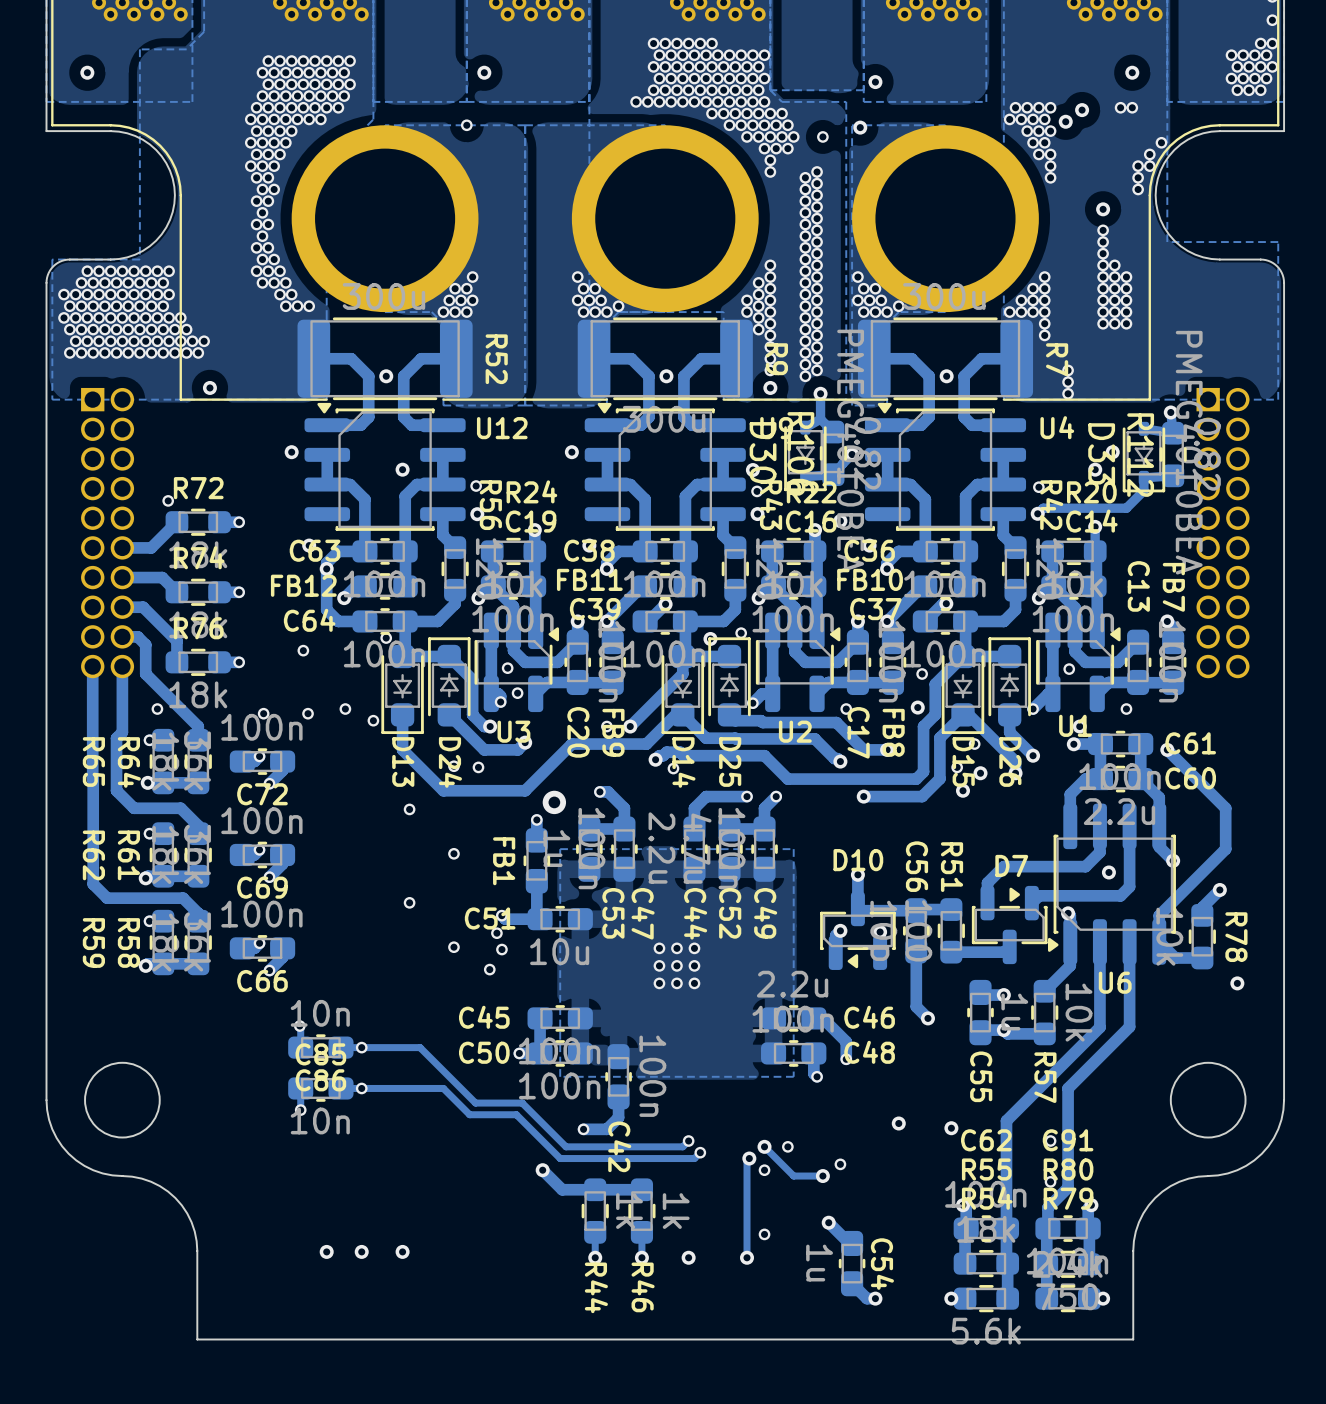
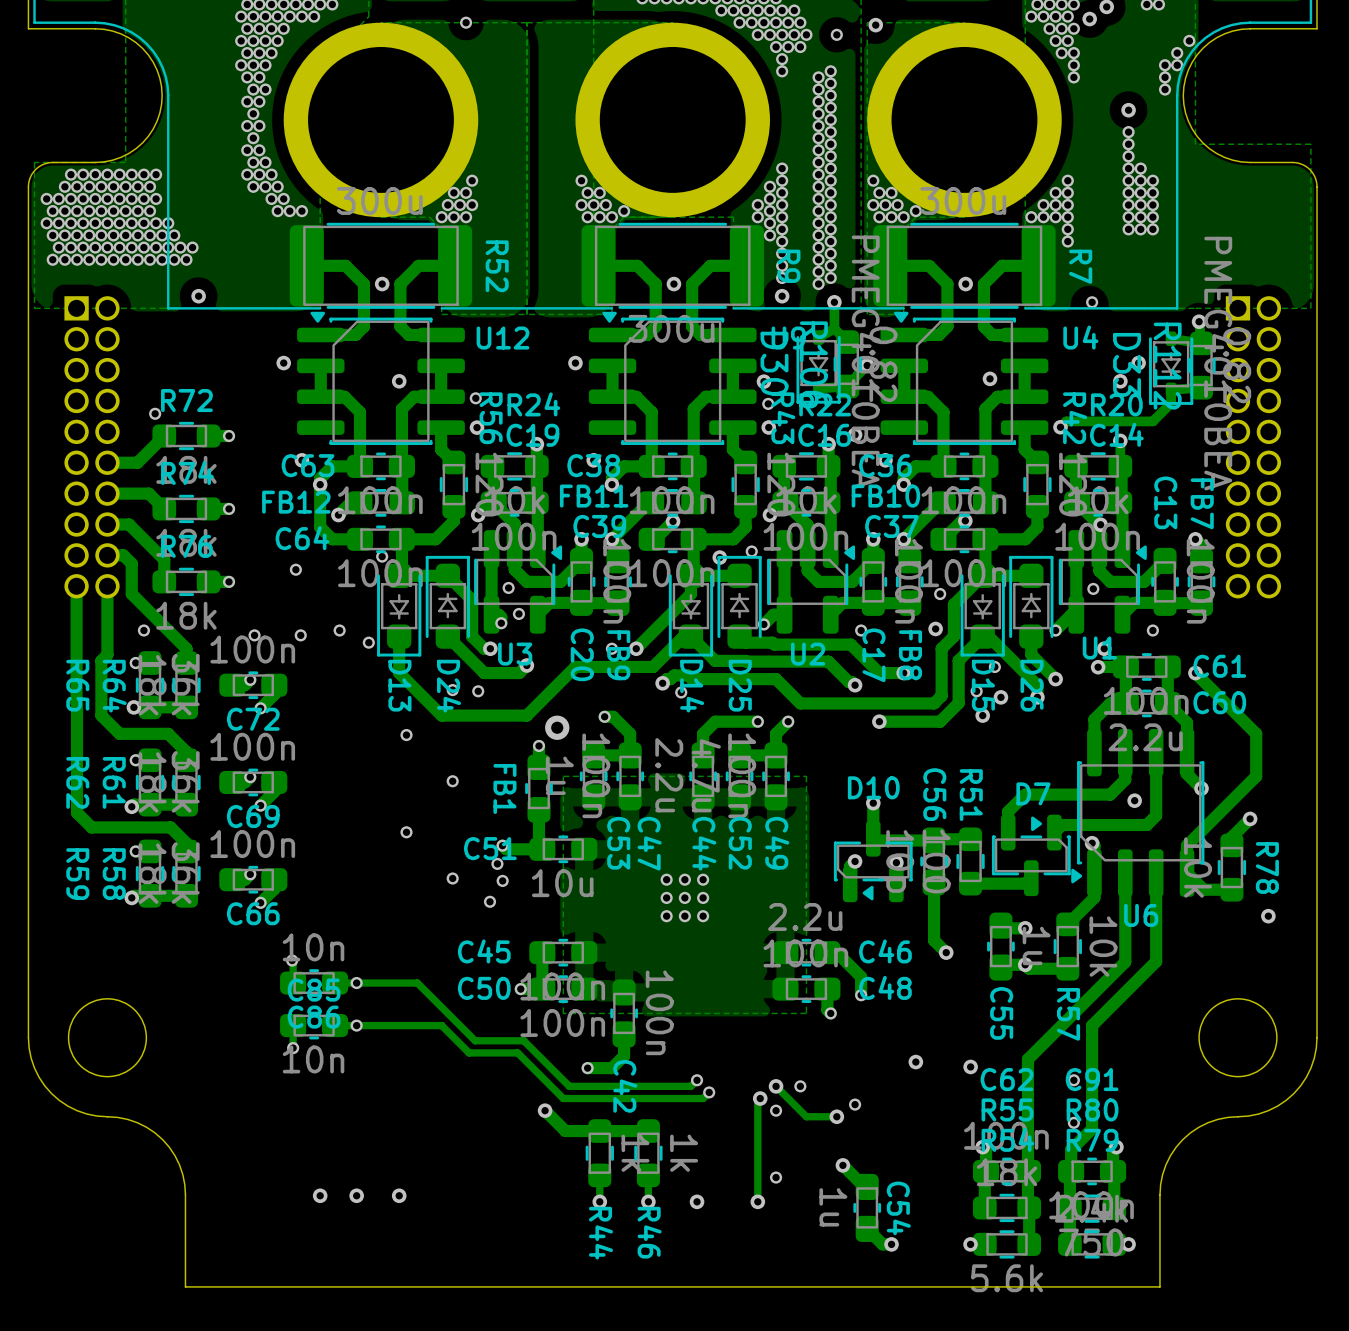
via: (1068, 370) -> none
via: (1068, 382) -> none
via: none -> (990, 378)
via: (1038, 487) -> none
via position: (1038, 598) -> (1100, 524)

